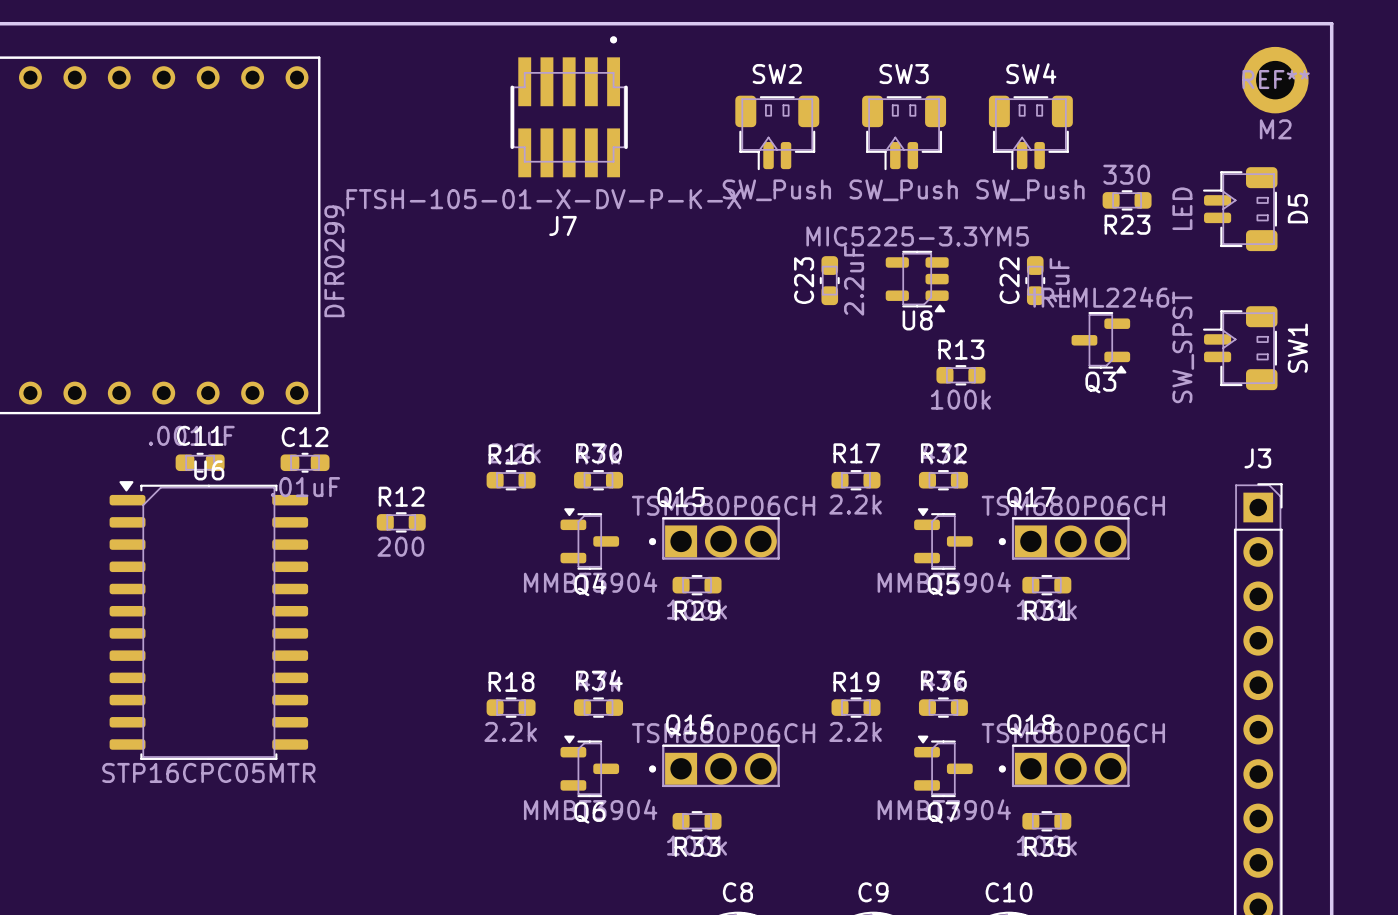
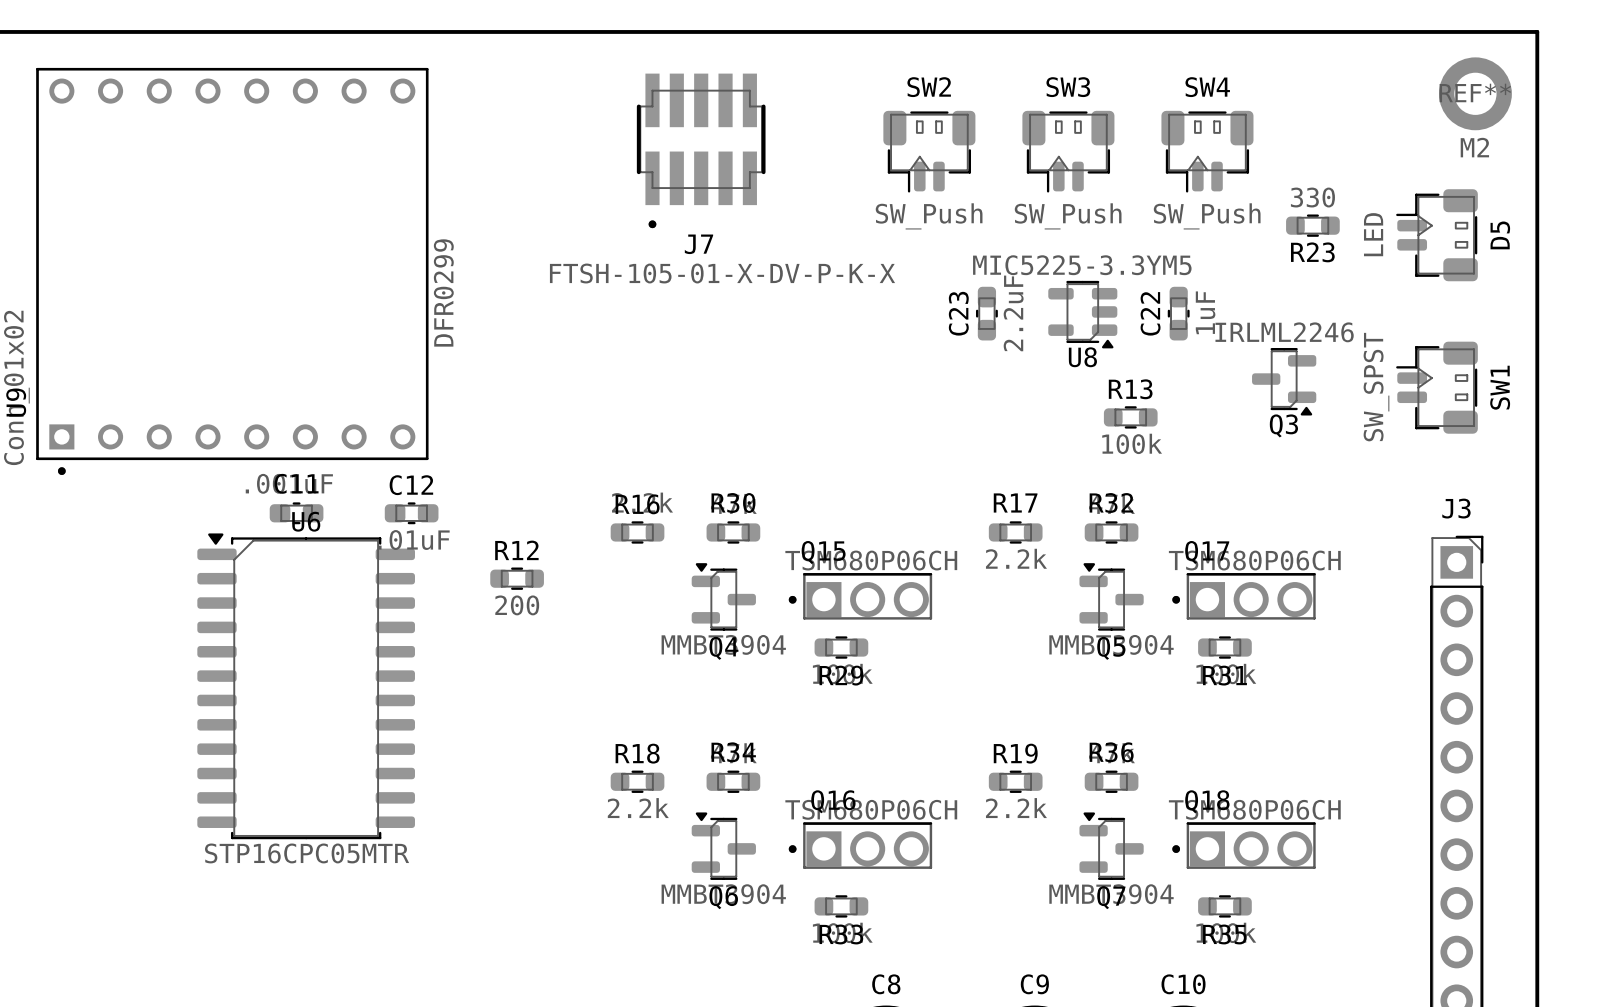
J7 rotation: 0° (569, 106) -> 180° (701, 150)
J7 value position: FTSH-105-01-X-DV-P-K-X (543, 199) -> FTSH-105-01-X-DV-P-K-X (722, 273)
C22 position: (1035, 280) -> (1178, 313)

